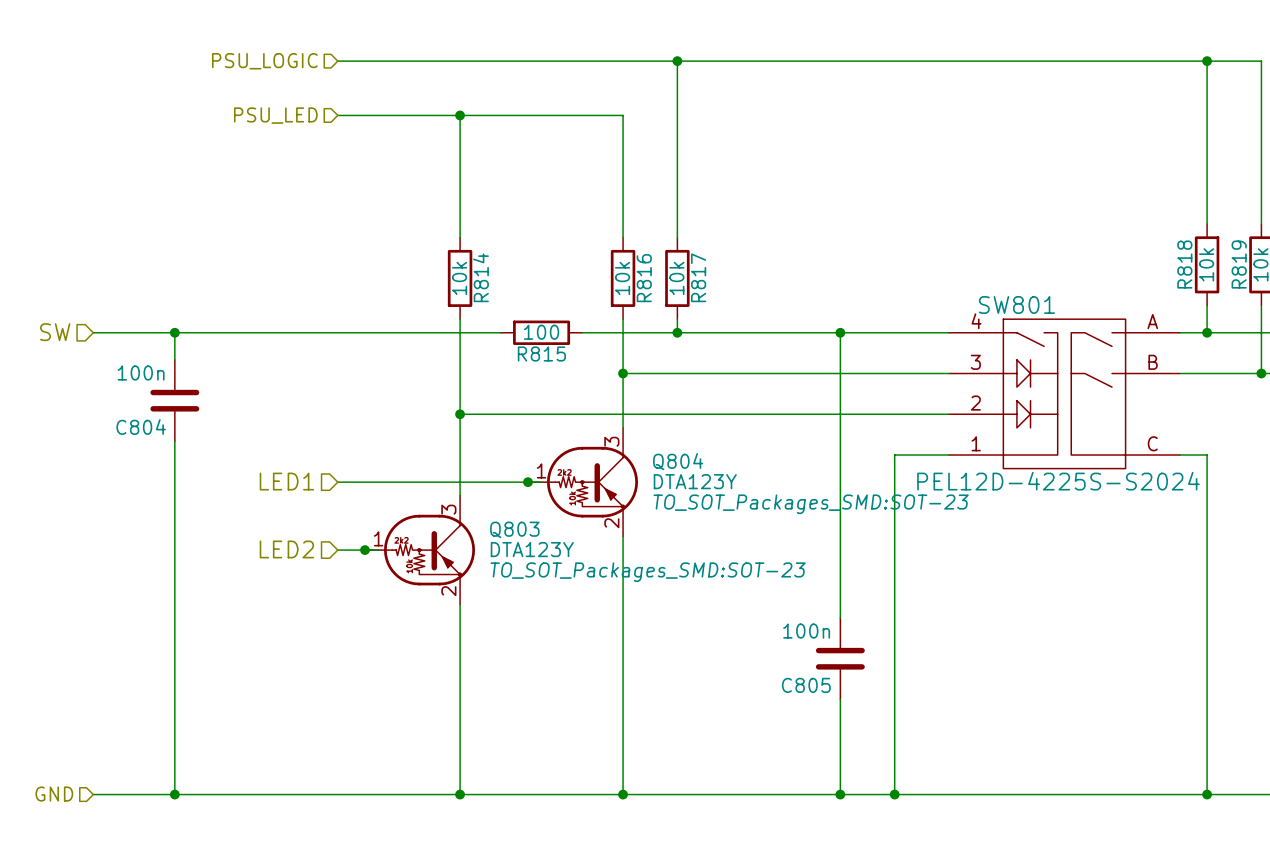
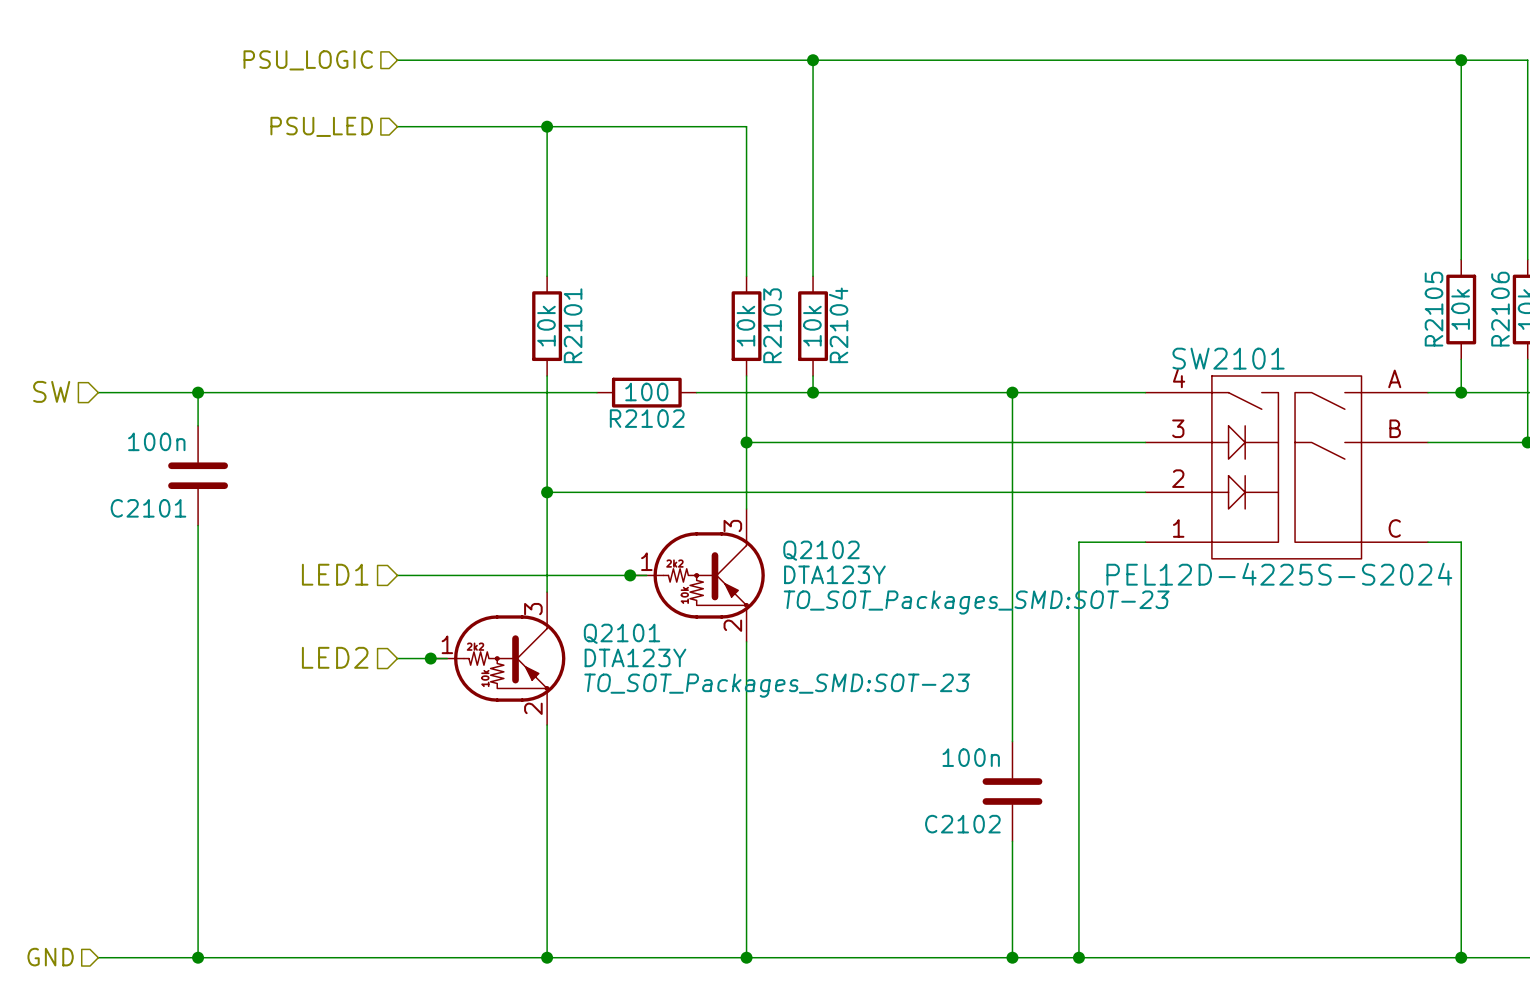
R818 name: R818 (1184, 264) -> R2105 (1434, 309)
R819 name: R819 (1239, 264) -> R2106 (1500, 309)
R814 name: R814 (480, 277) -> R2101 (573, 325)
R817 name: R817 (698, 277) -> R2104 (838, 325)
R816 name: R816 (644, 278) -> R2103 (772, 325)
SW801 name: SW801 (1016, 304) -> SW2101 (1228, 358)
R815 name: R815 (541, 353) -> R2102 (647, 418)
C804 name: C804 (141, 427) -> C2101 (148, 508)
Q804 name: Q804 (678, 461) -> Q2102 (821, 550)
Q803 name: Q803 (514, 529) -> Q2101 (622, 633)
C805 name: C805 (806, 685) -> C2102 (962, 824)

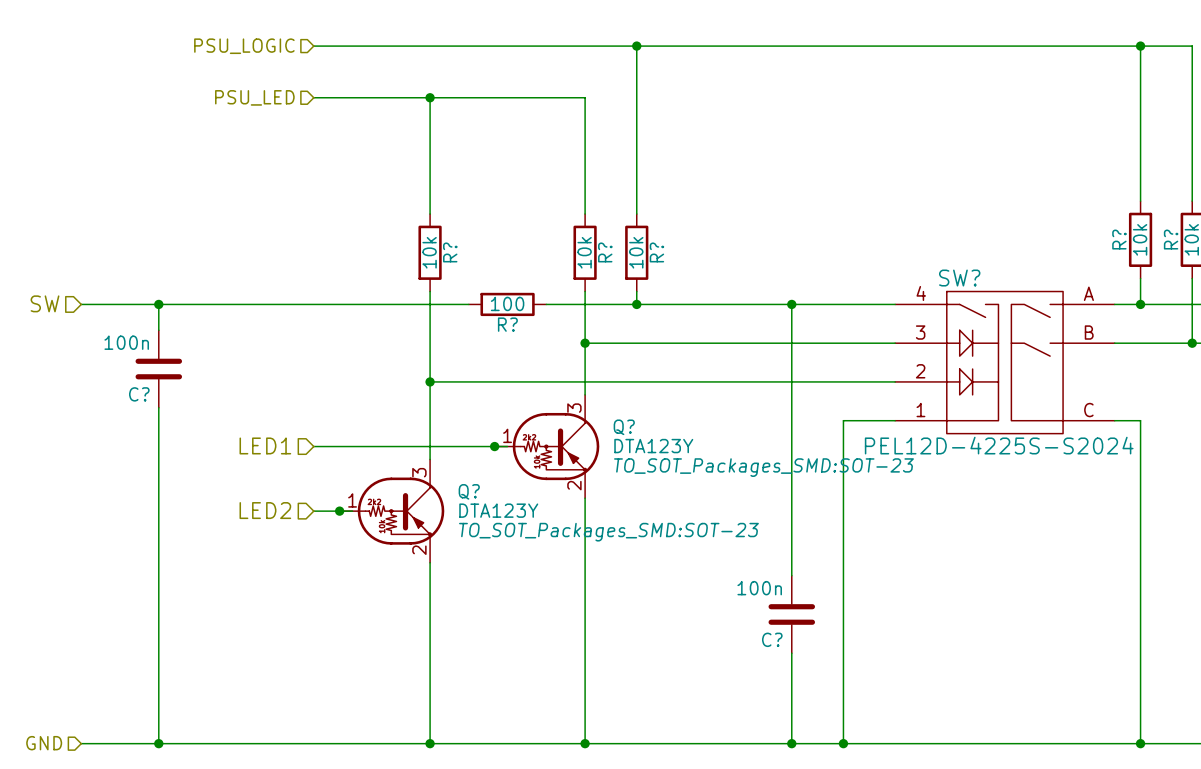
R2105 name: R2105 (1434, 309) -> R? (1119, 239)
R2106 name: R2106 (1500, 309) -> R? (1171, 239)
R2101 name: R2101 (573, 325) -> R? (450, 252)
R2103 name: R2103 (772, 325) -> R? (605, 252)
R2104 name: R2104 (838, 325) -> R? (656, 252)
SW2101 name: SW2101 (1228, 358) -> SW? (959, 278)
R2102 name: R2102 (647, 418) -> R? (507, 324)
C2101 name: C2101 (148, 508) -> C? (139, 394)
Q2102 name: Q2102 (821, 550) -> Q? (624, 427)
Q2101 name: Q2101 (622, 633) -> Q? (469, 491)
C2102 name: C2102 (962, 824) -> C? (772, 639)

